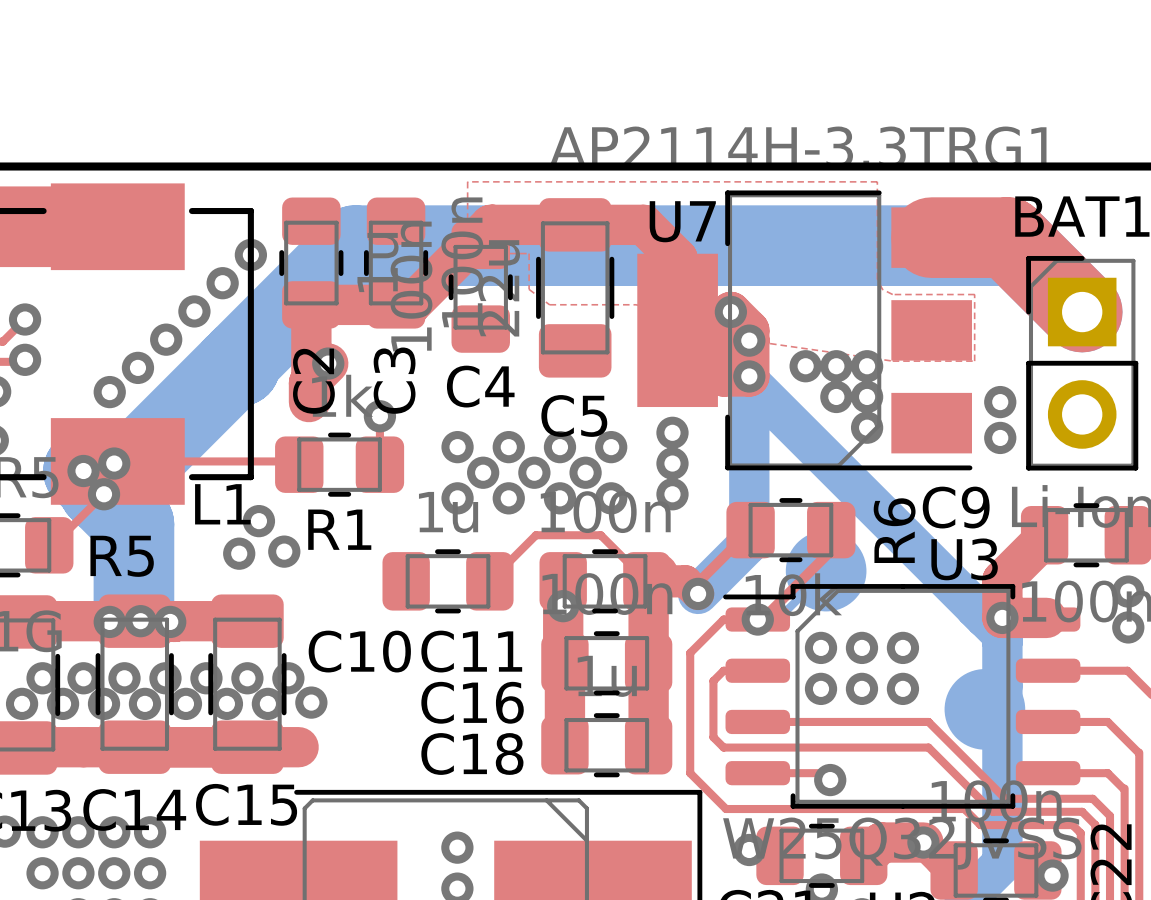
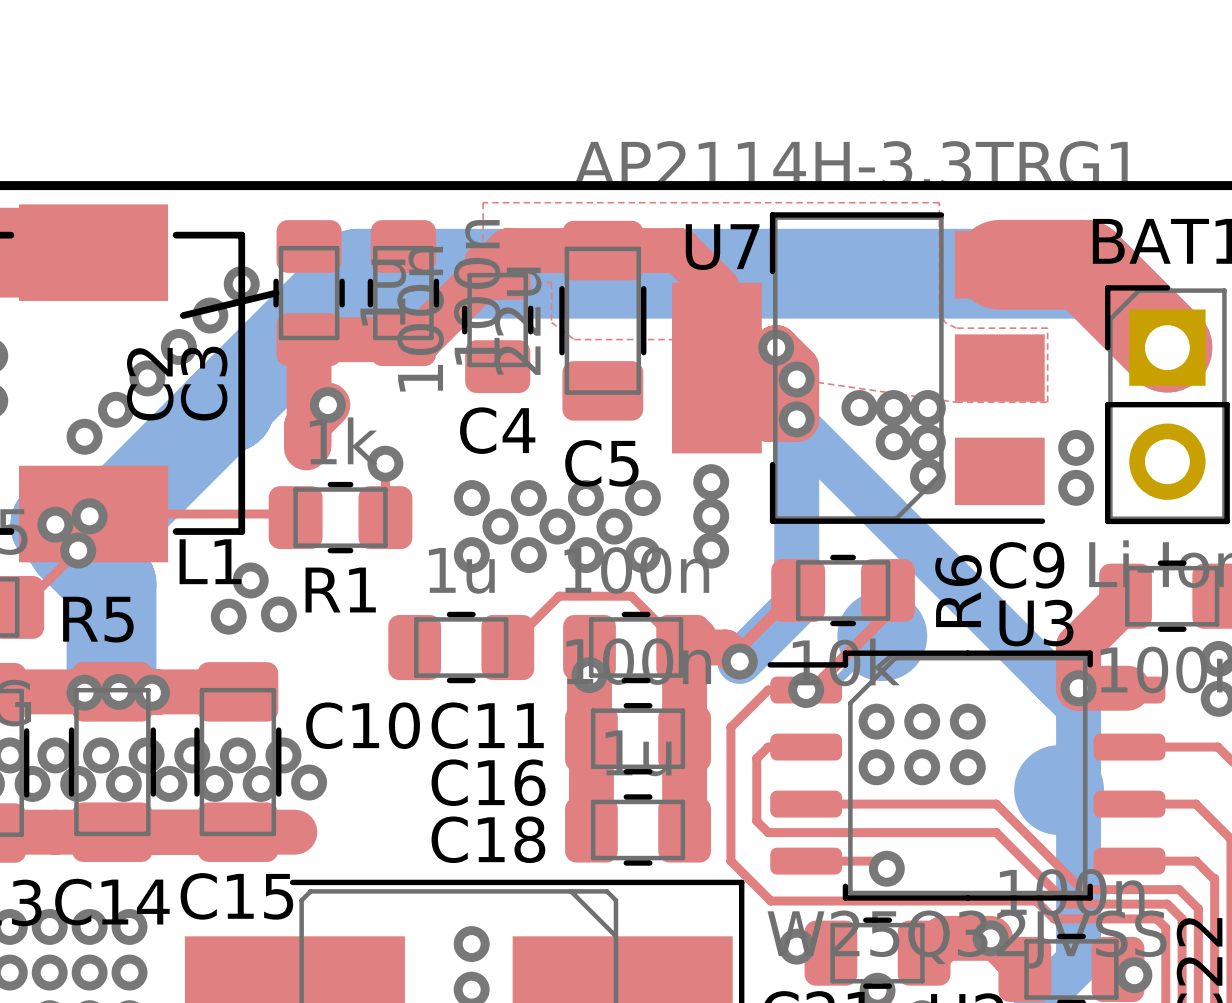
line: none -> (276, 293) (183, 315)
C3 name position: C3 (394, 380) -> C3 (204, 383)
C2 name position: C2 (313, 381) -> C2 (150, 384)

